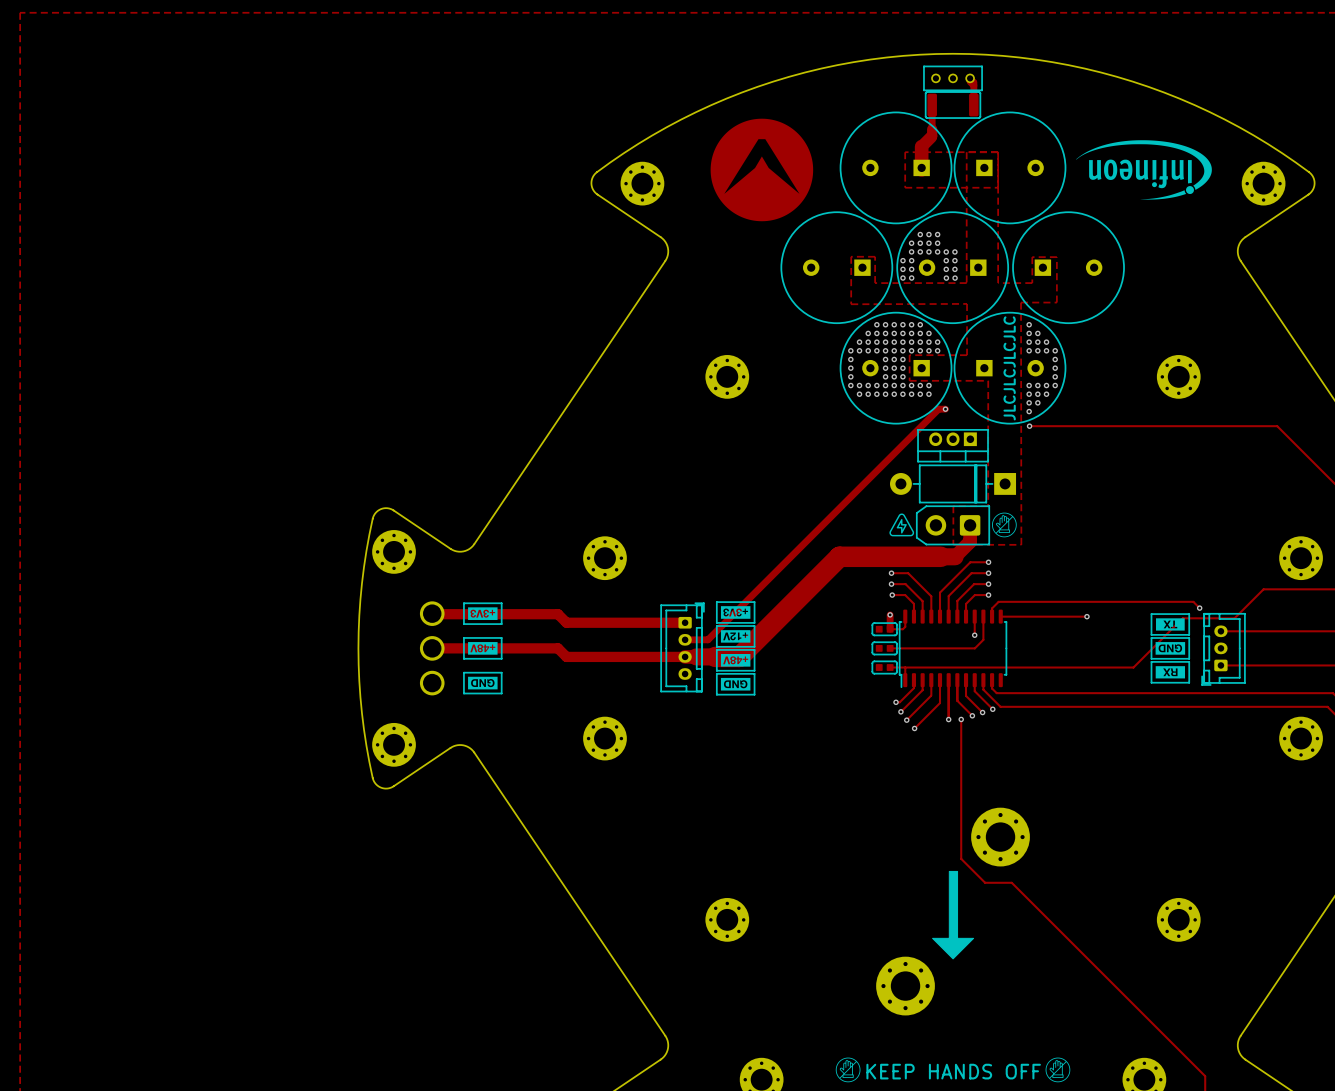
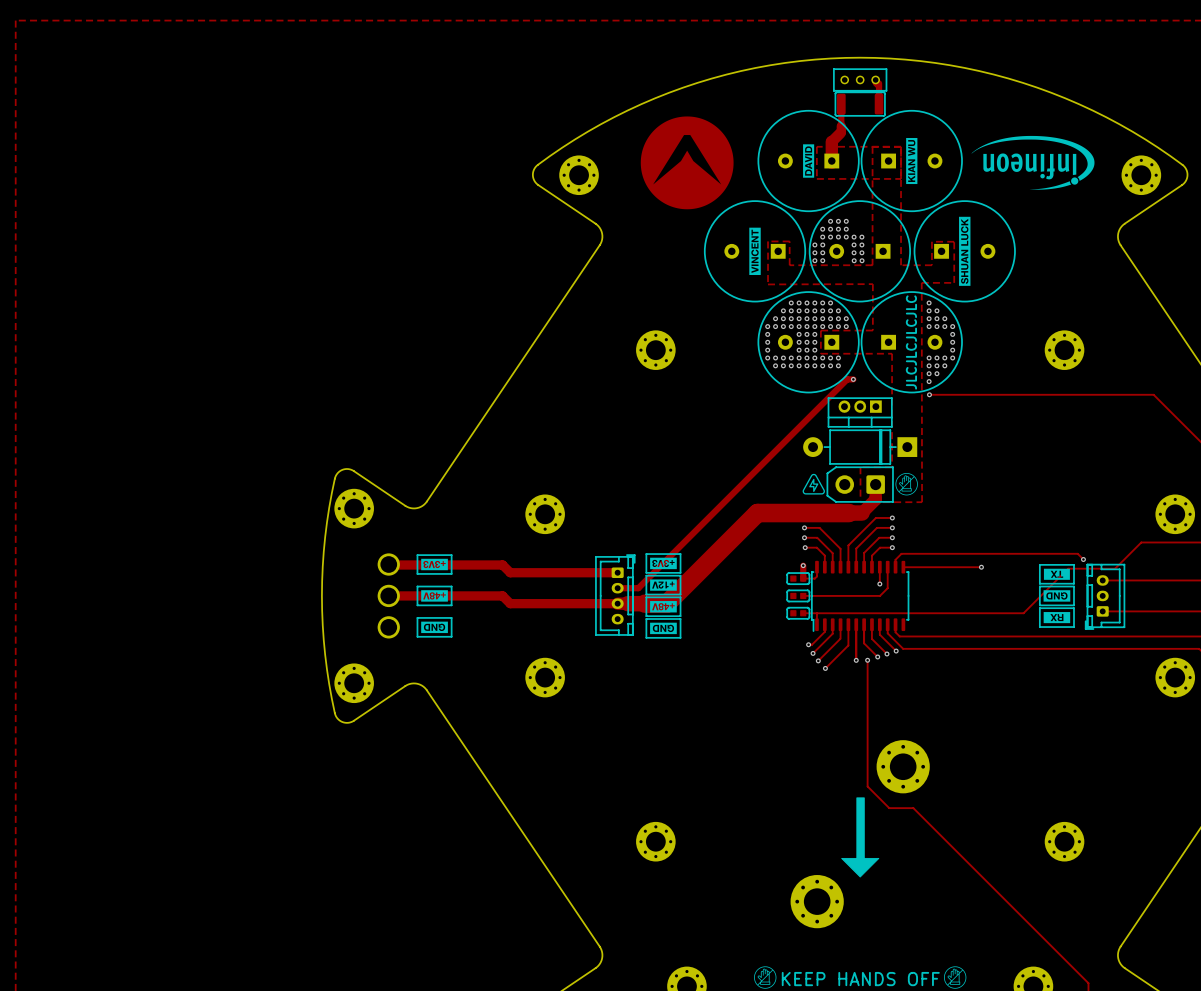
drawing: none -> [906, 137, 918, 185]
drawing: none -> [803, 144, 815, 178]
drawing: none -> [959, 216, 971, 286]
drawing: none -> [749, 227, 761, 275]

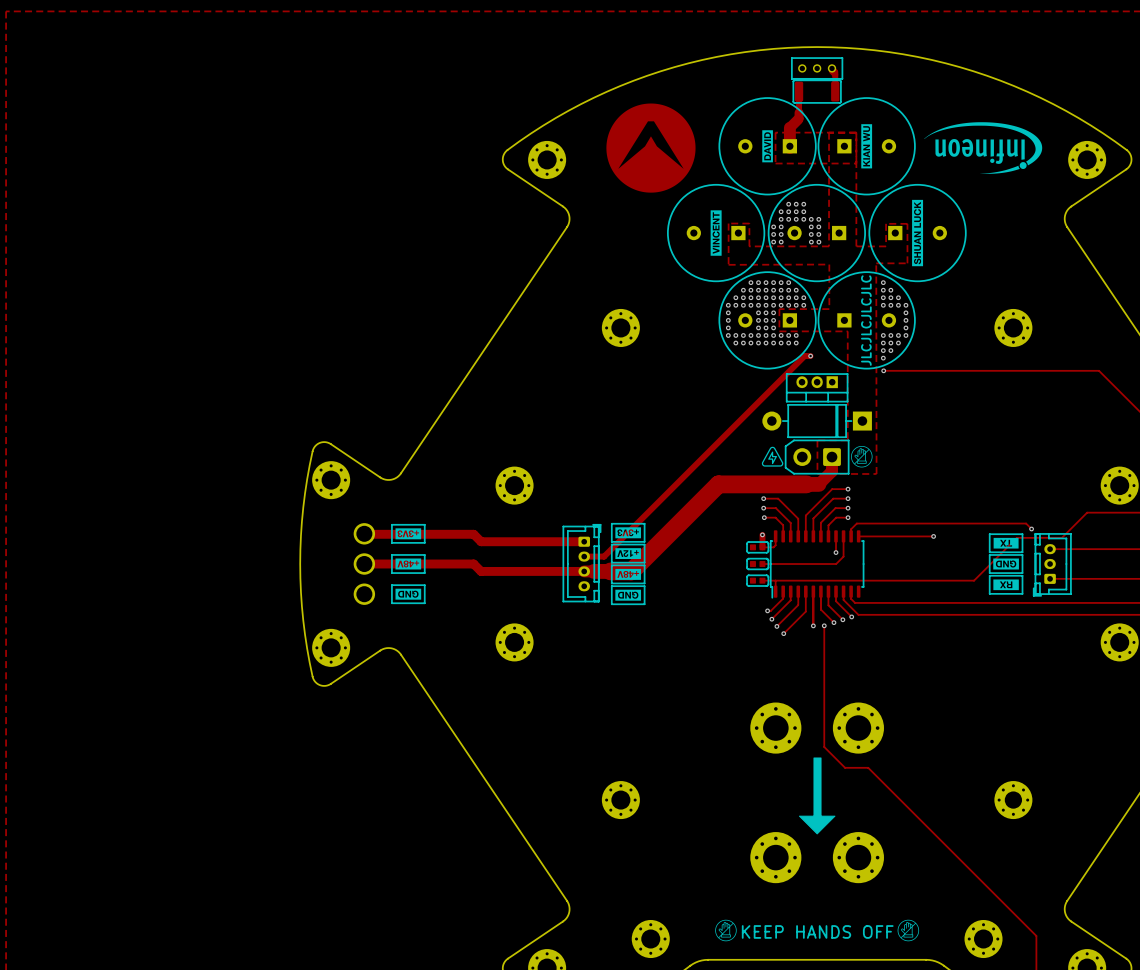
part: none -> (775, 728)
round board edge: none -> [1003, 789, 1024, 811]
part: none -> (858, 857)

